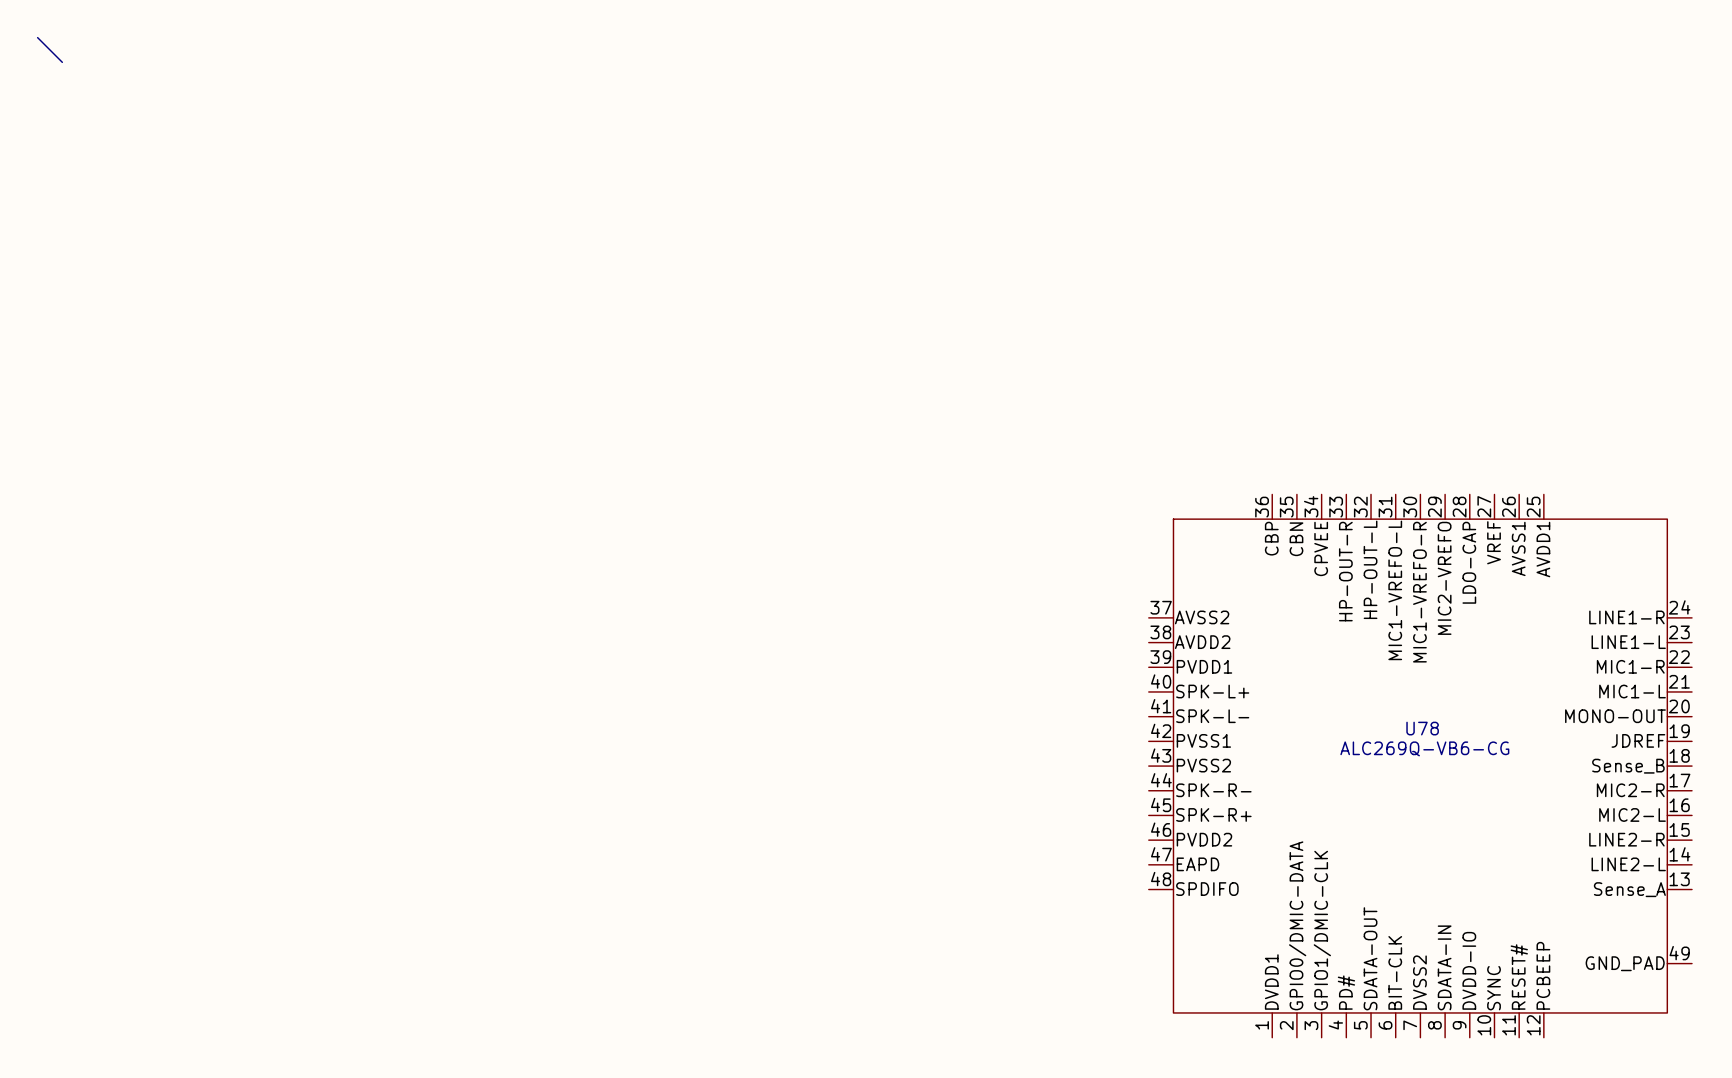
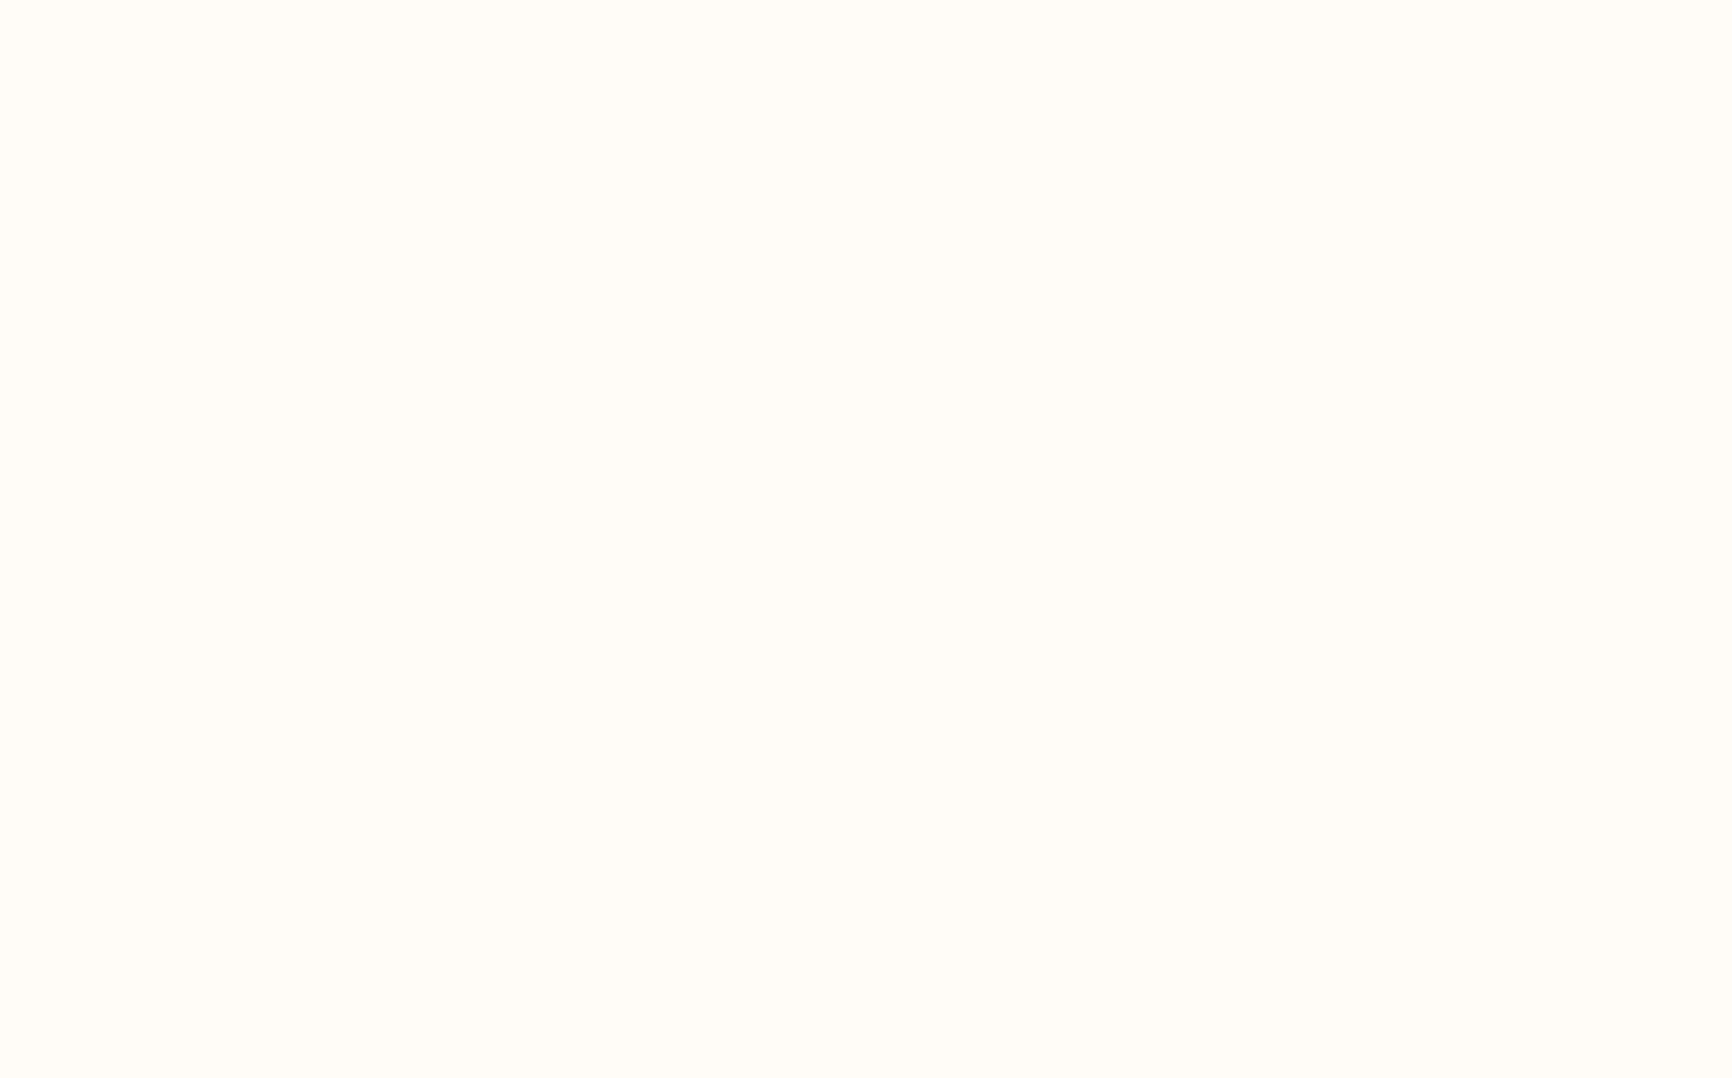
wire: (37, 37) (62, 62) -> none
U78: ALC269Q-VB6-CG (1420, 766) -> none

